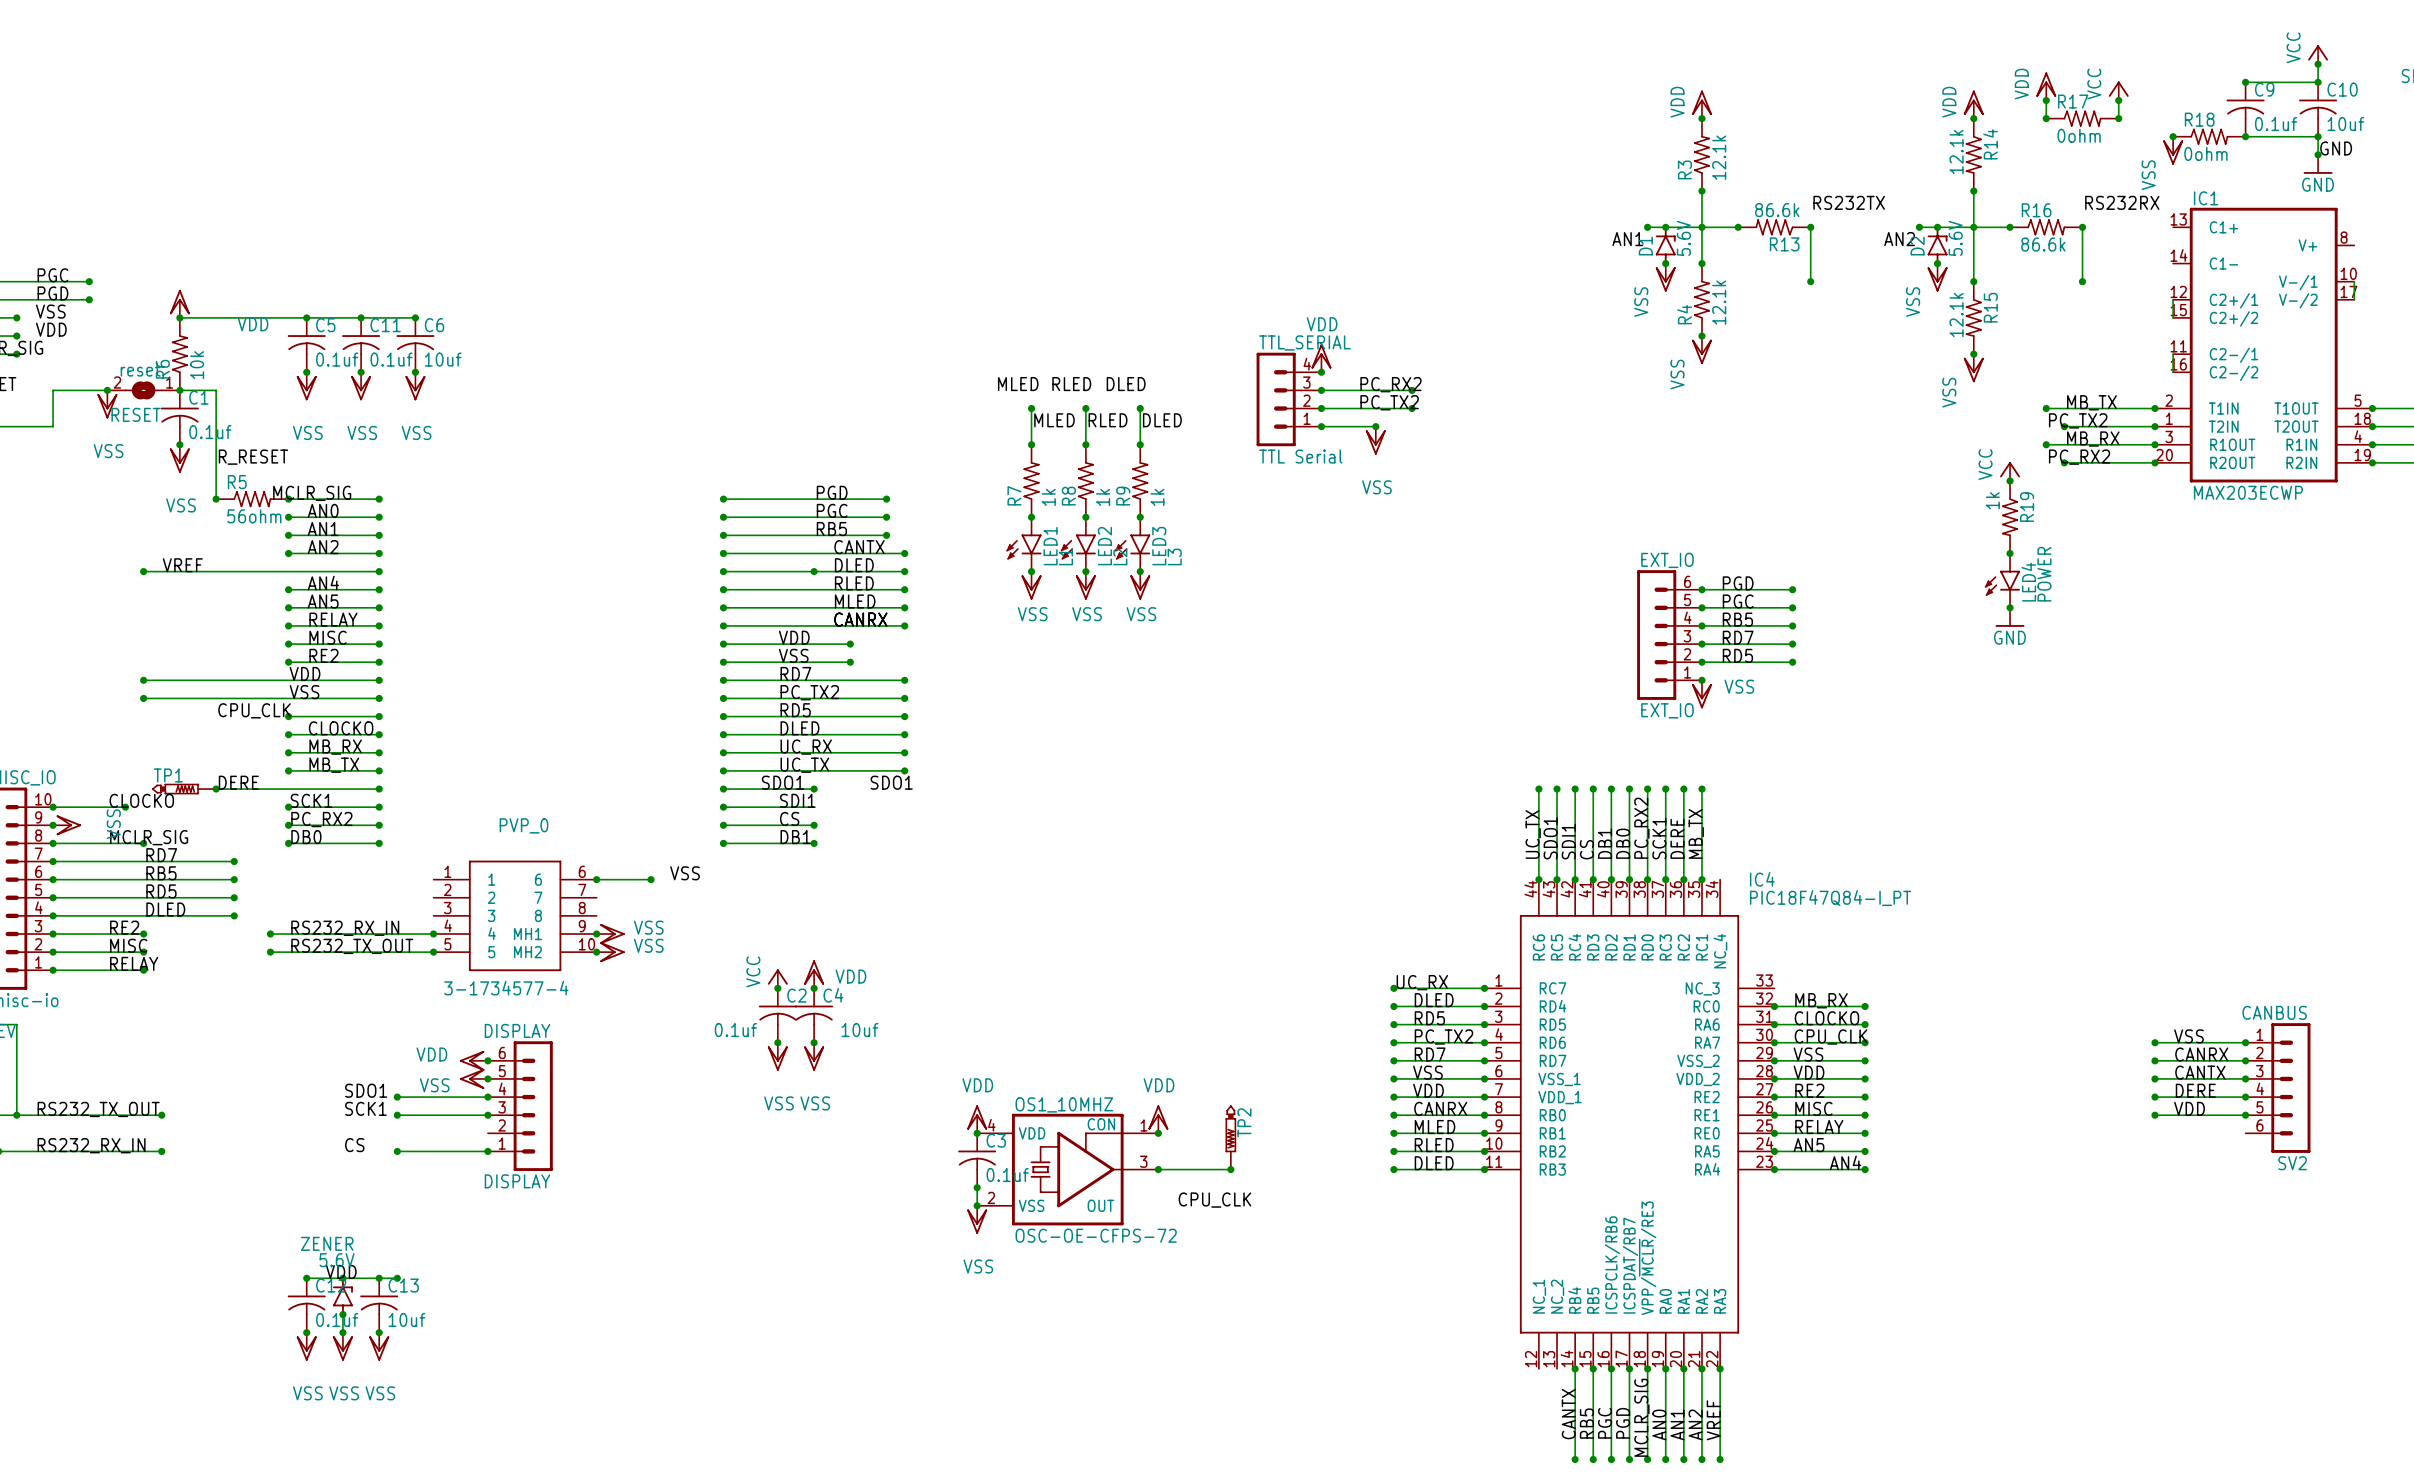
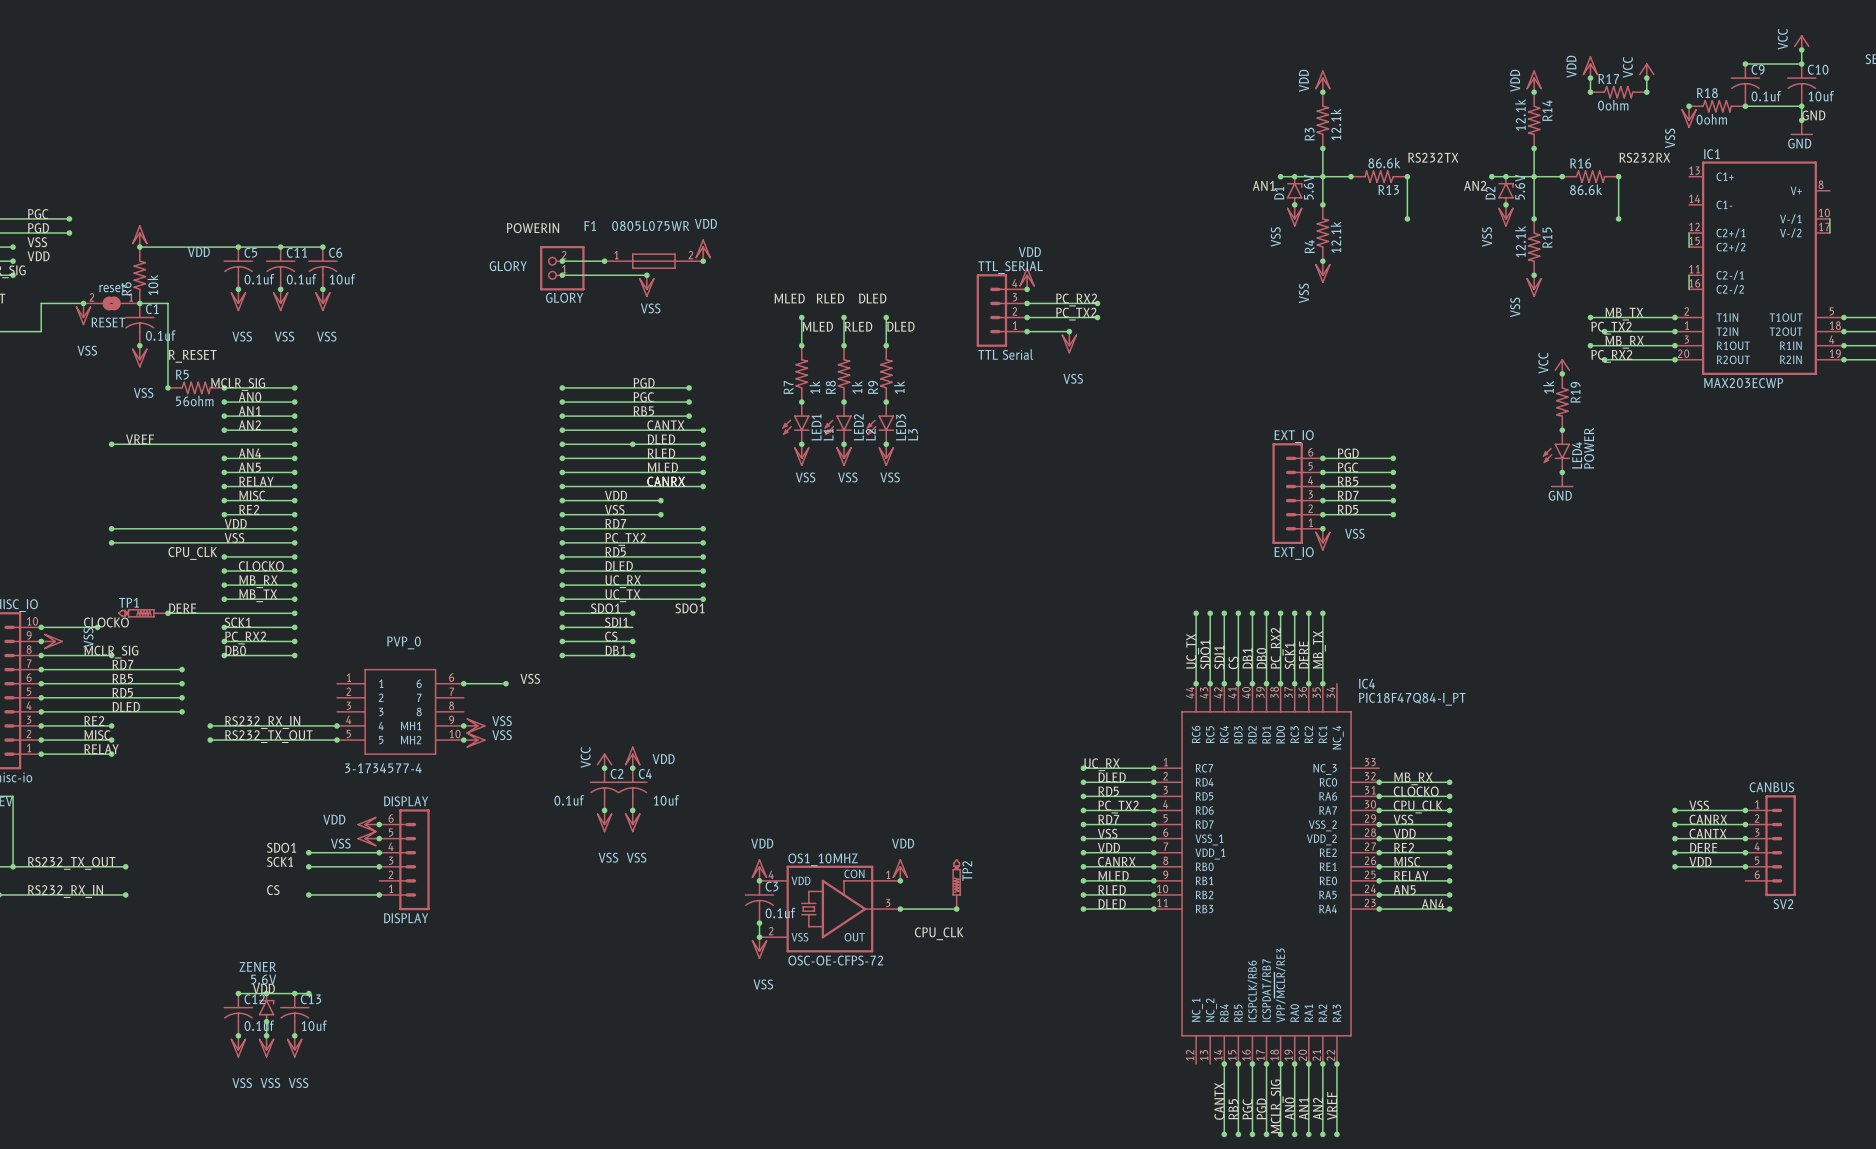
label: none -> POWERIN (532, 228)
power symbol: none -> VDD (703, 250)
wire: none -> (562, 261) (604, 261)
junction: none -> (562, 261)
junction: none -> (604, 261)
F1: none -> 0805L075WR (653, 261)
junction: none -> (703, 261)
GLORY: none -> GLORY (562, 268)
wire: none -> (562, 275) (646, 275)
junction: none -> (562, 275)
junction: none -> (646, 275)
power symbol: none -> VSS (646, 286)

